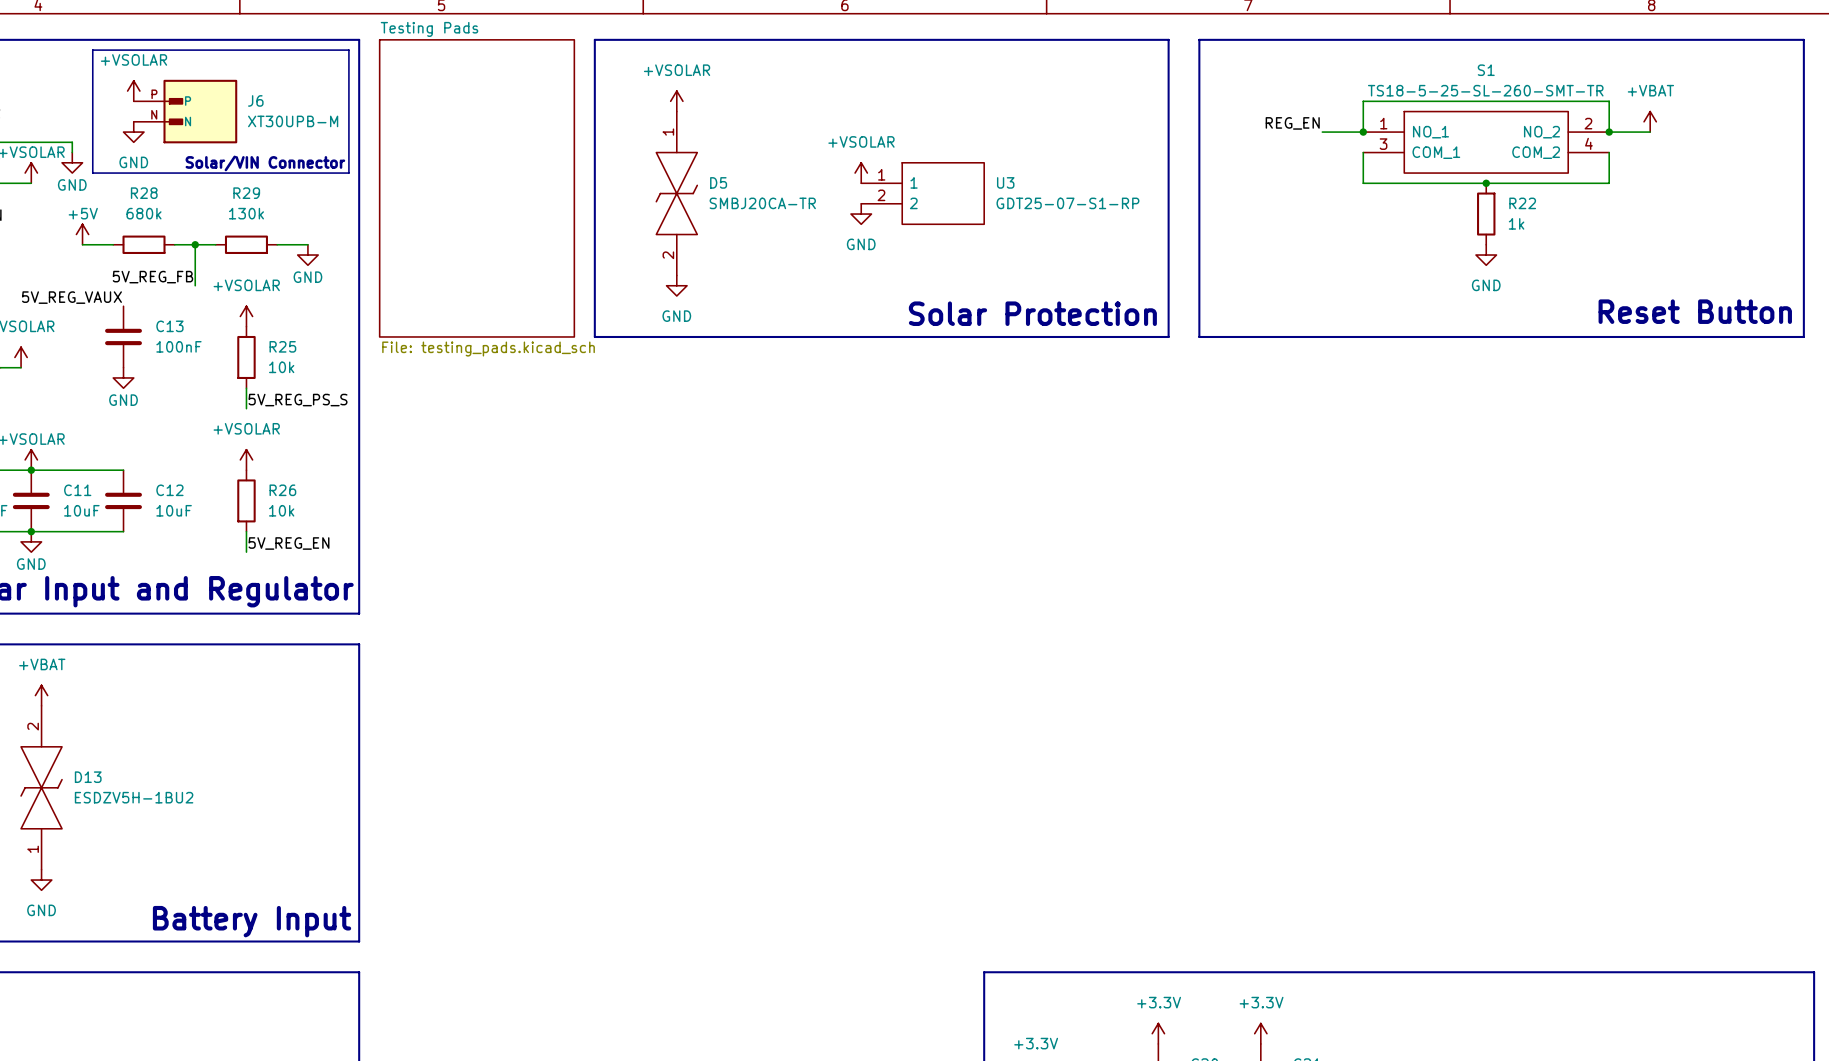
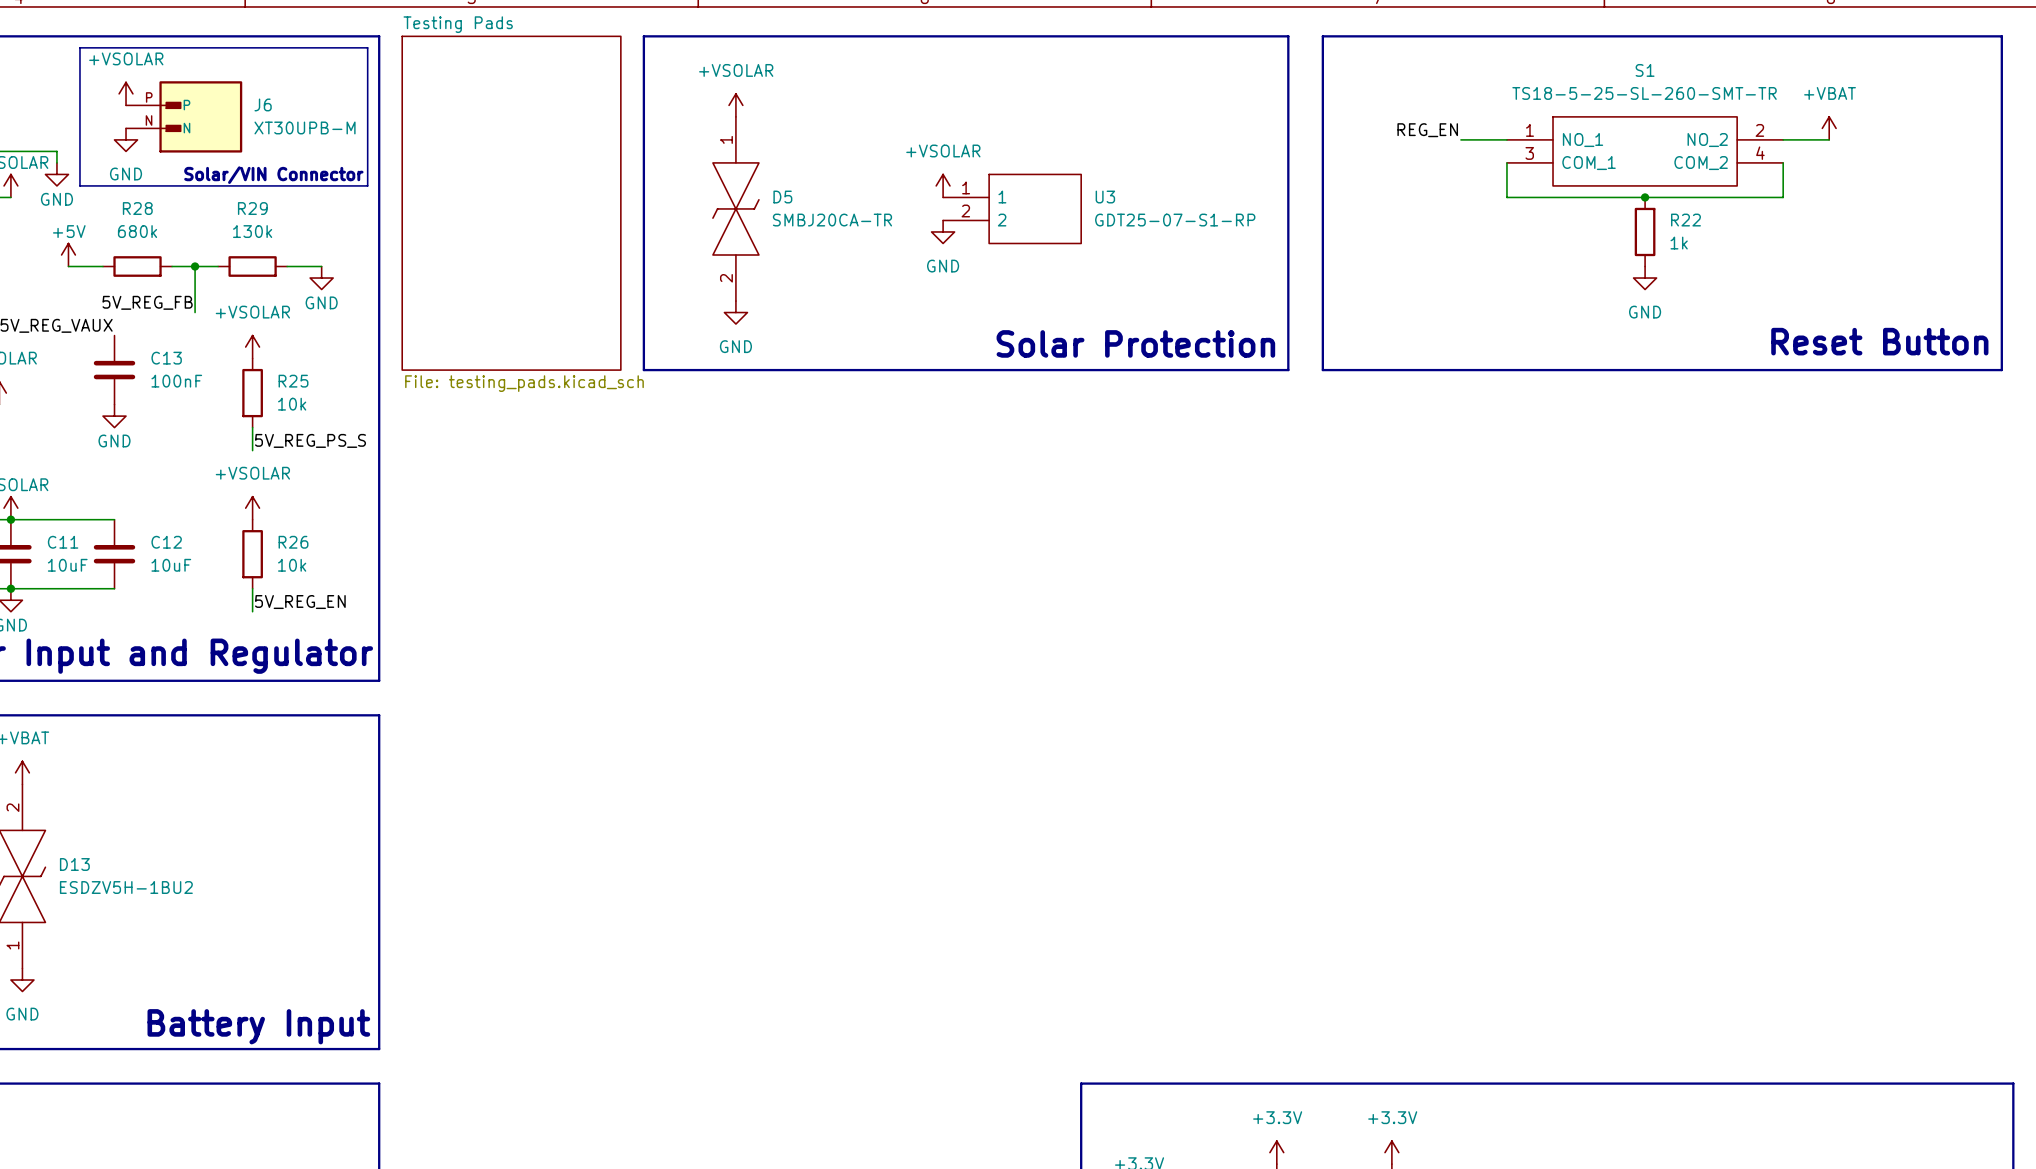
wire: (1363, 132) (1363, 101) (1609, 101) (1609, 132) -> none
junction: (1363, 132) -> none
junction: (1609, 132) -> none

